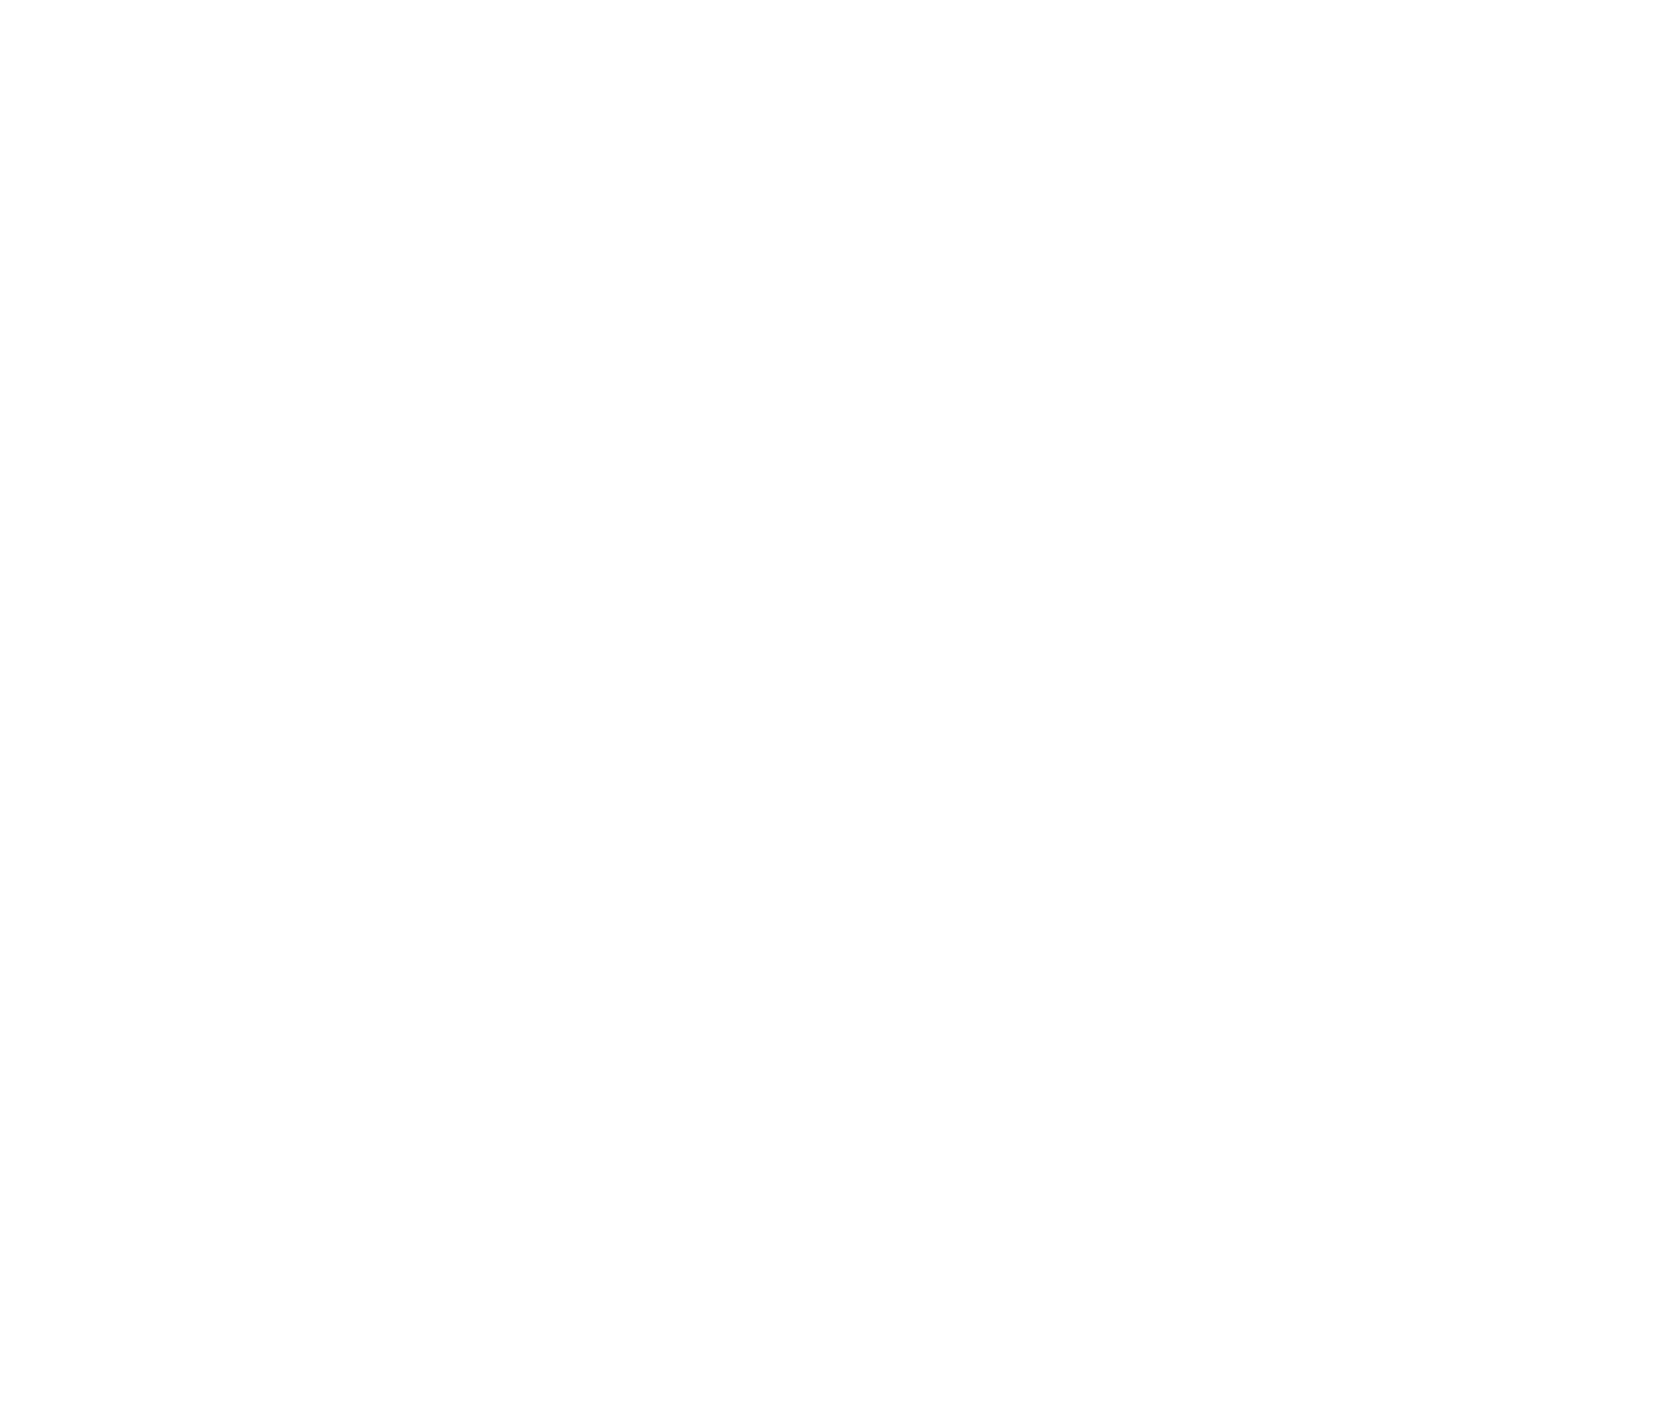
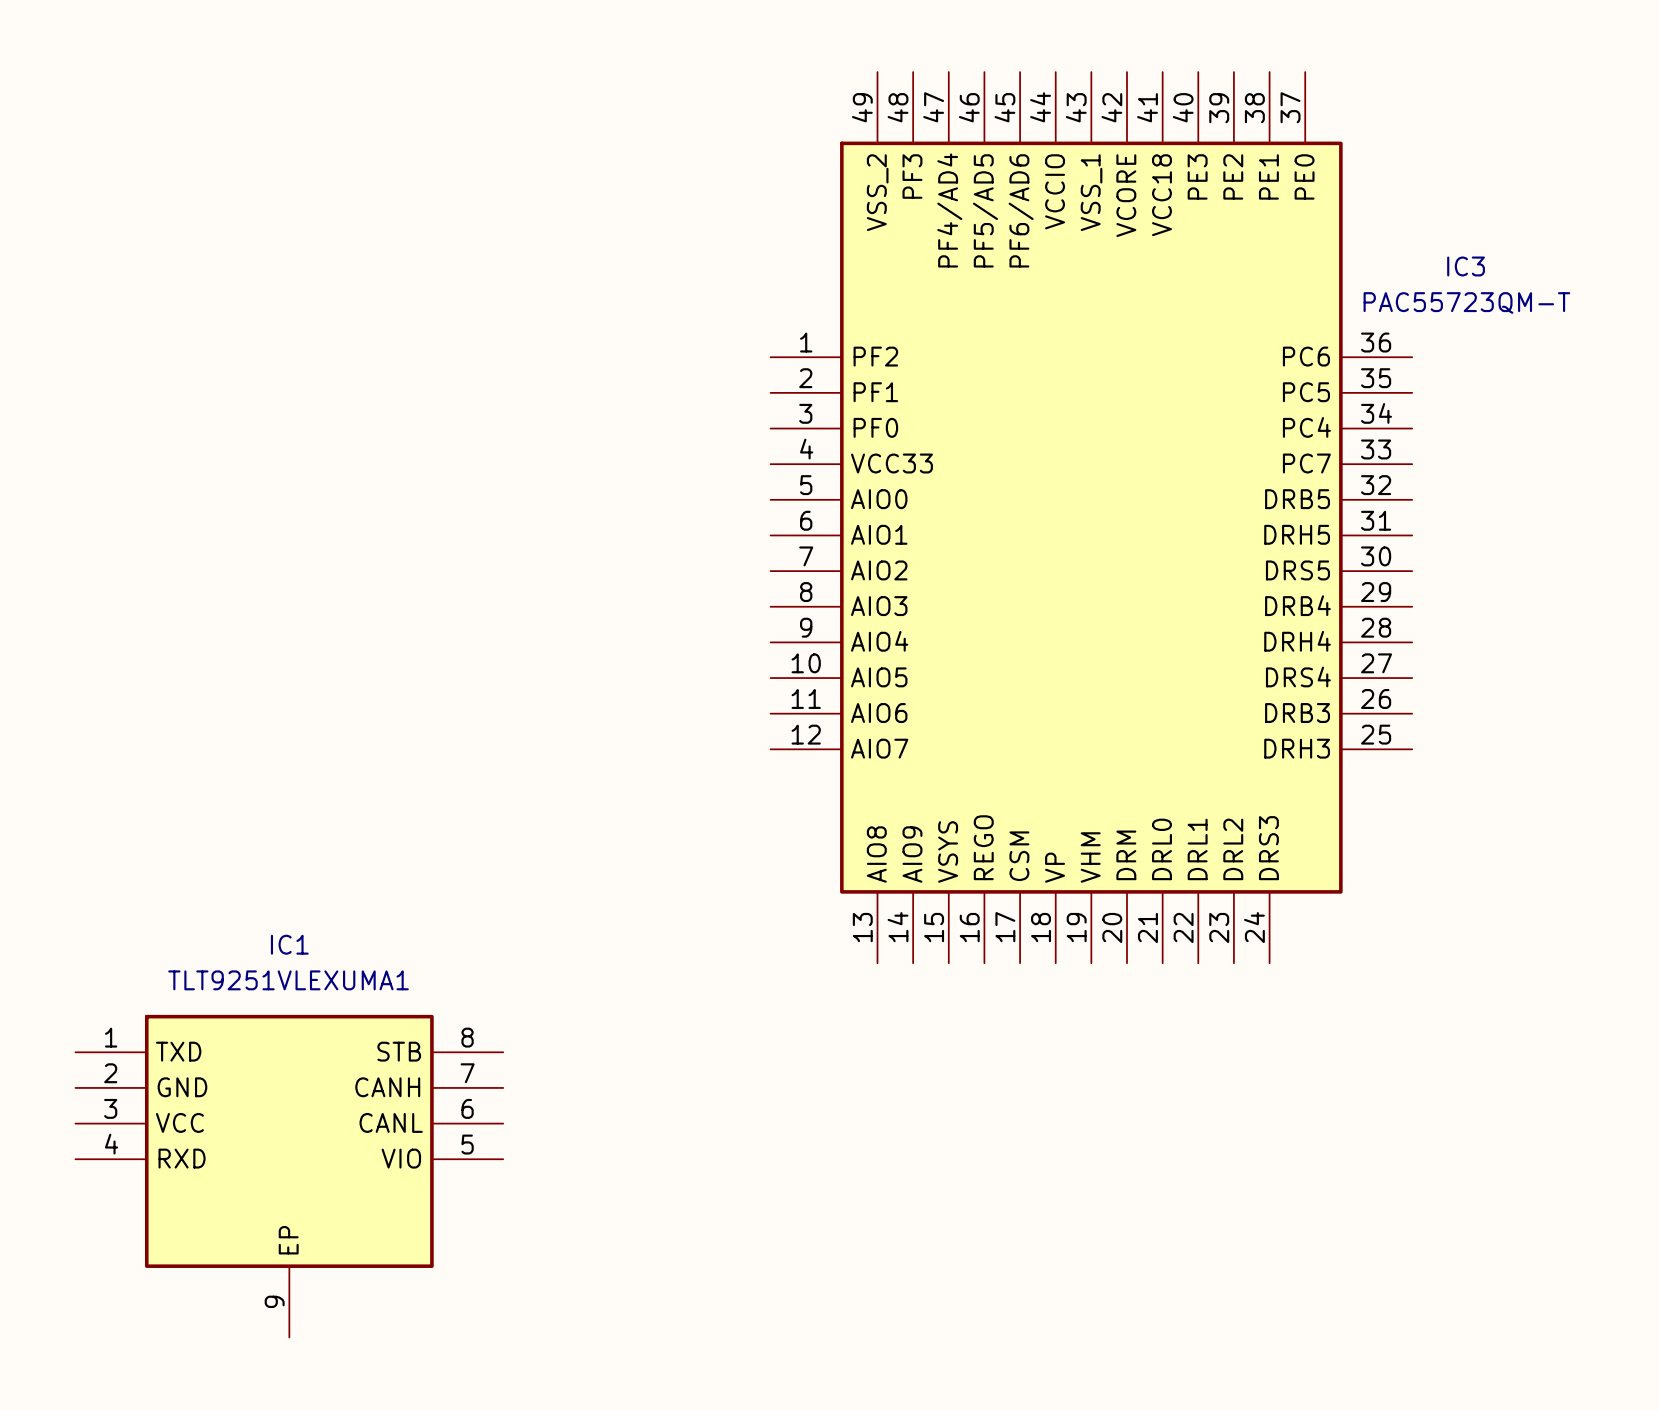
IC3: none -> PAC55723QM-T (1091, 517)
IC1: none -> TLT9251VLEXUMA1 (289, 1176)

